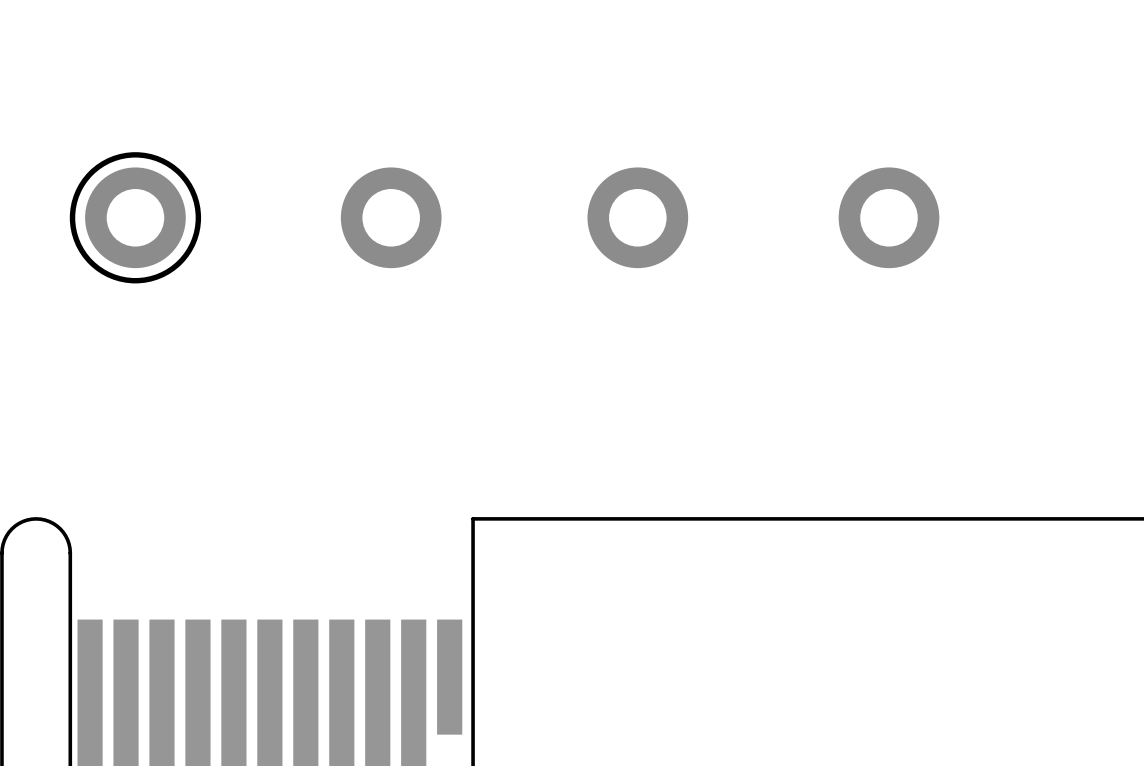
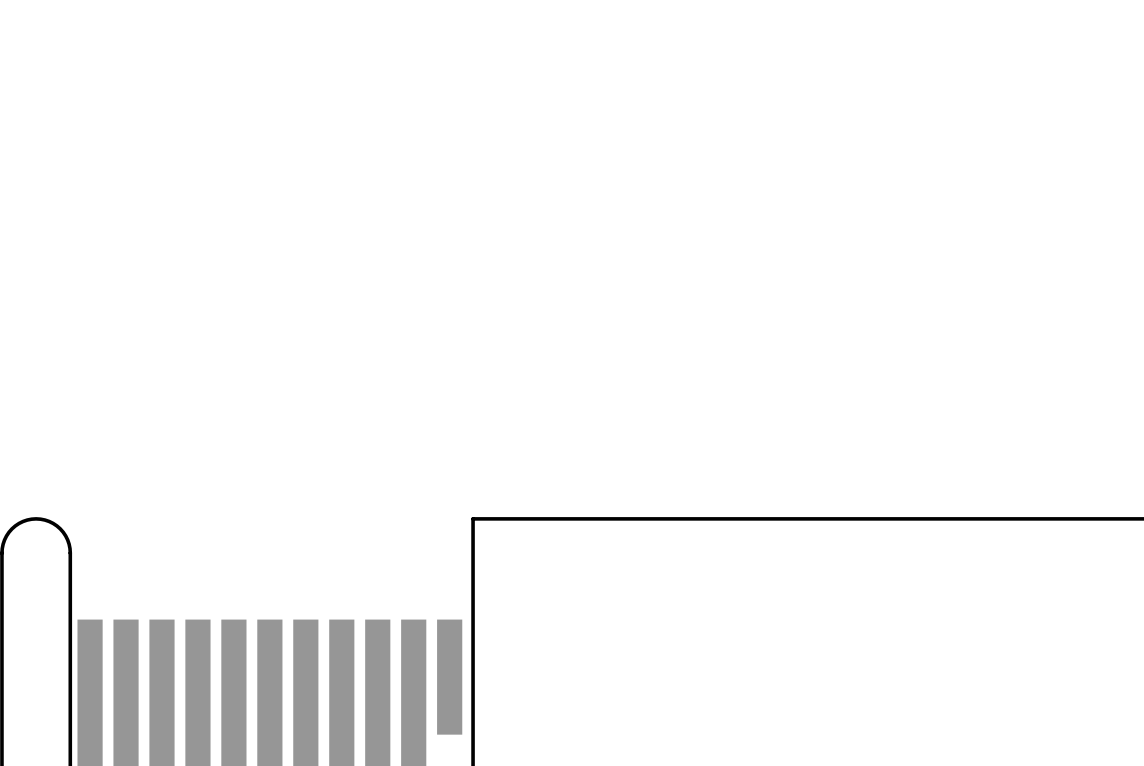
part: (135, 217) -> none
part: (391, 217) -> none
part: (637, 217) -> none
part: (889, 217) -> none

